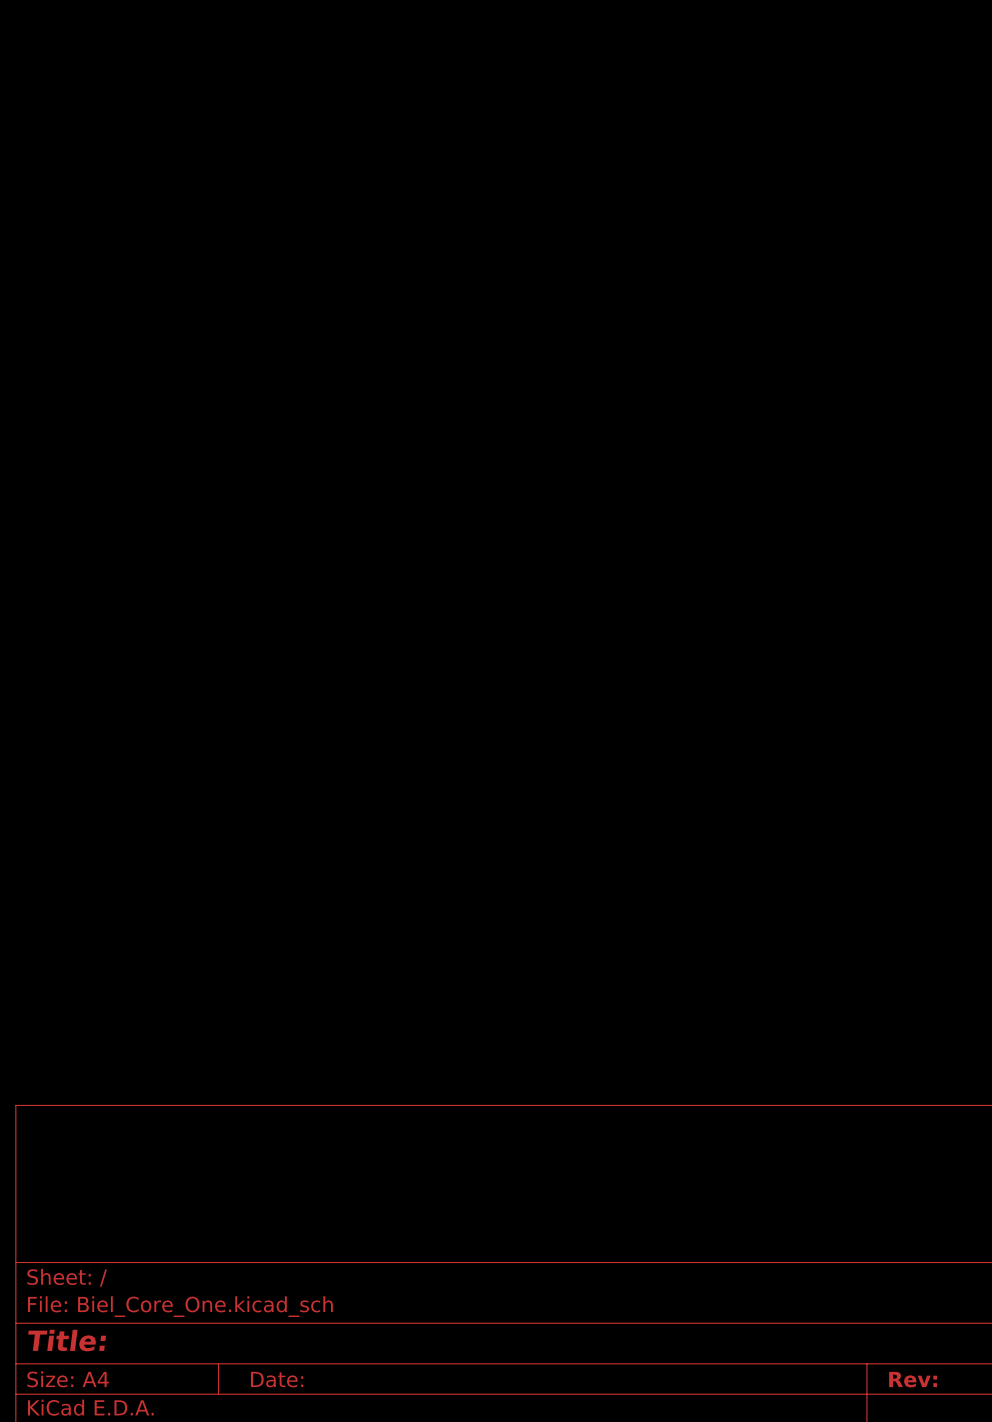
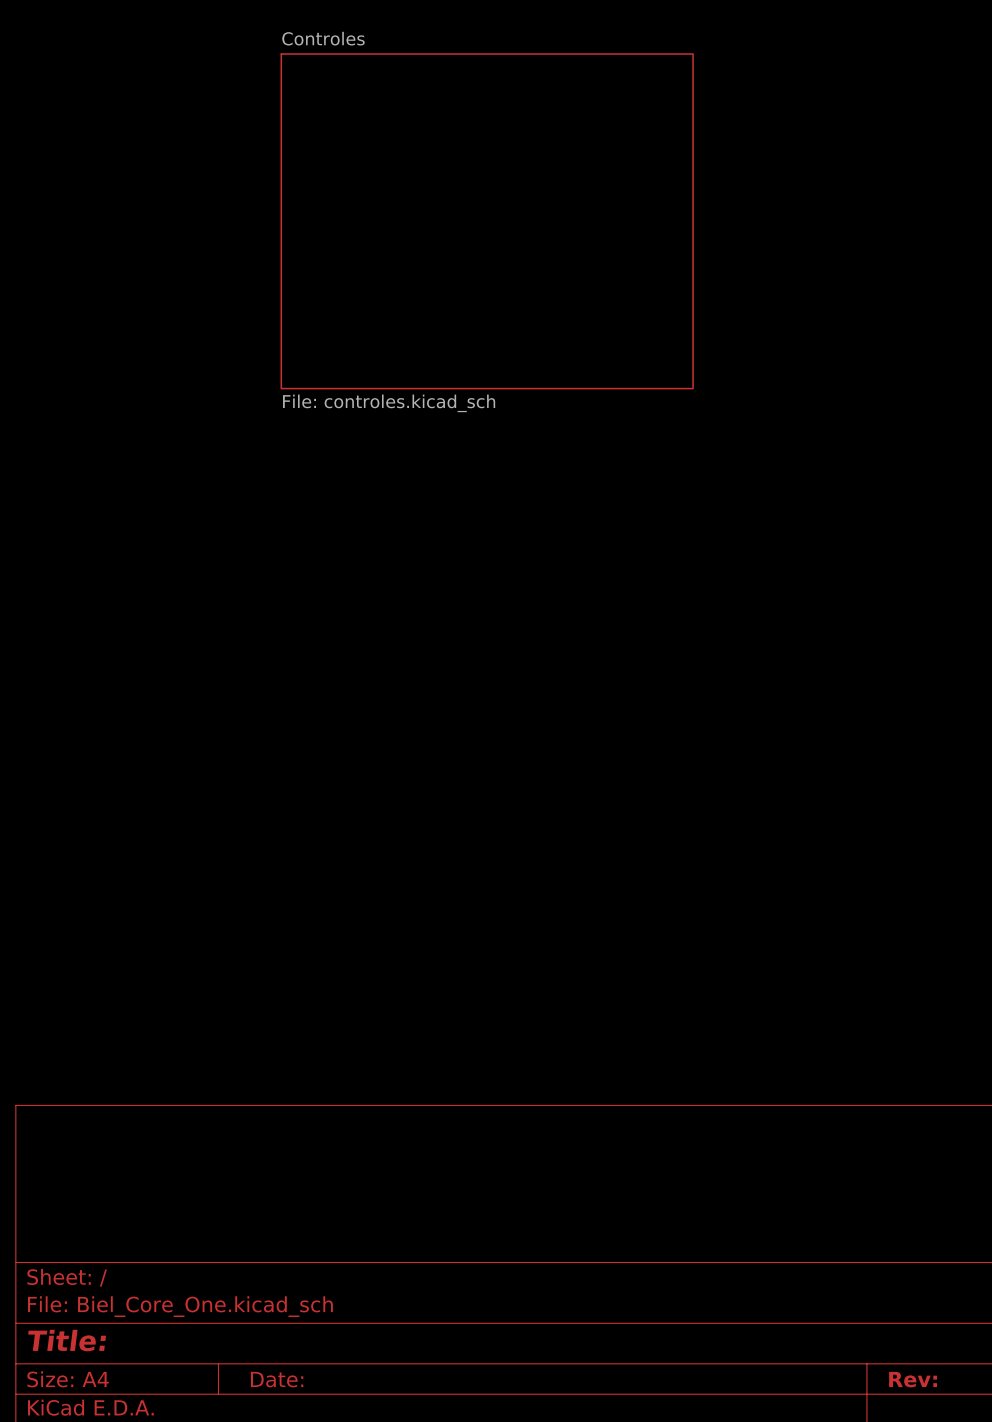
sheet Controles: none -> File: controles.kicad_sch (487, 221)

